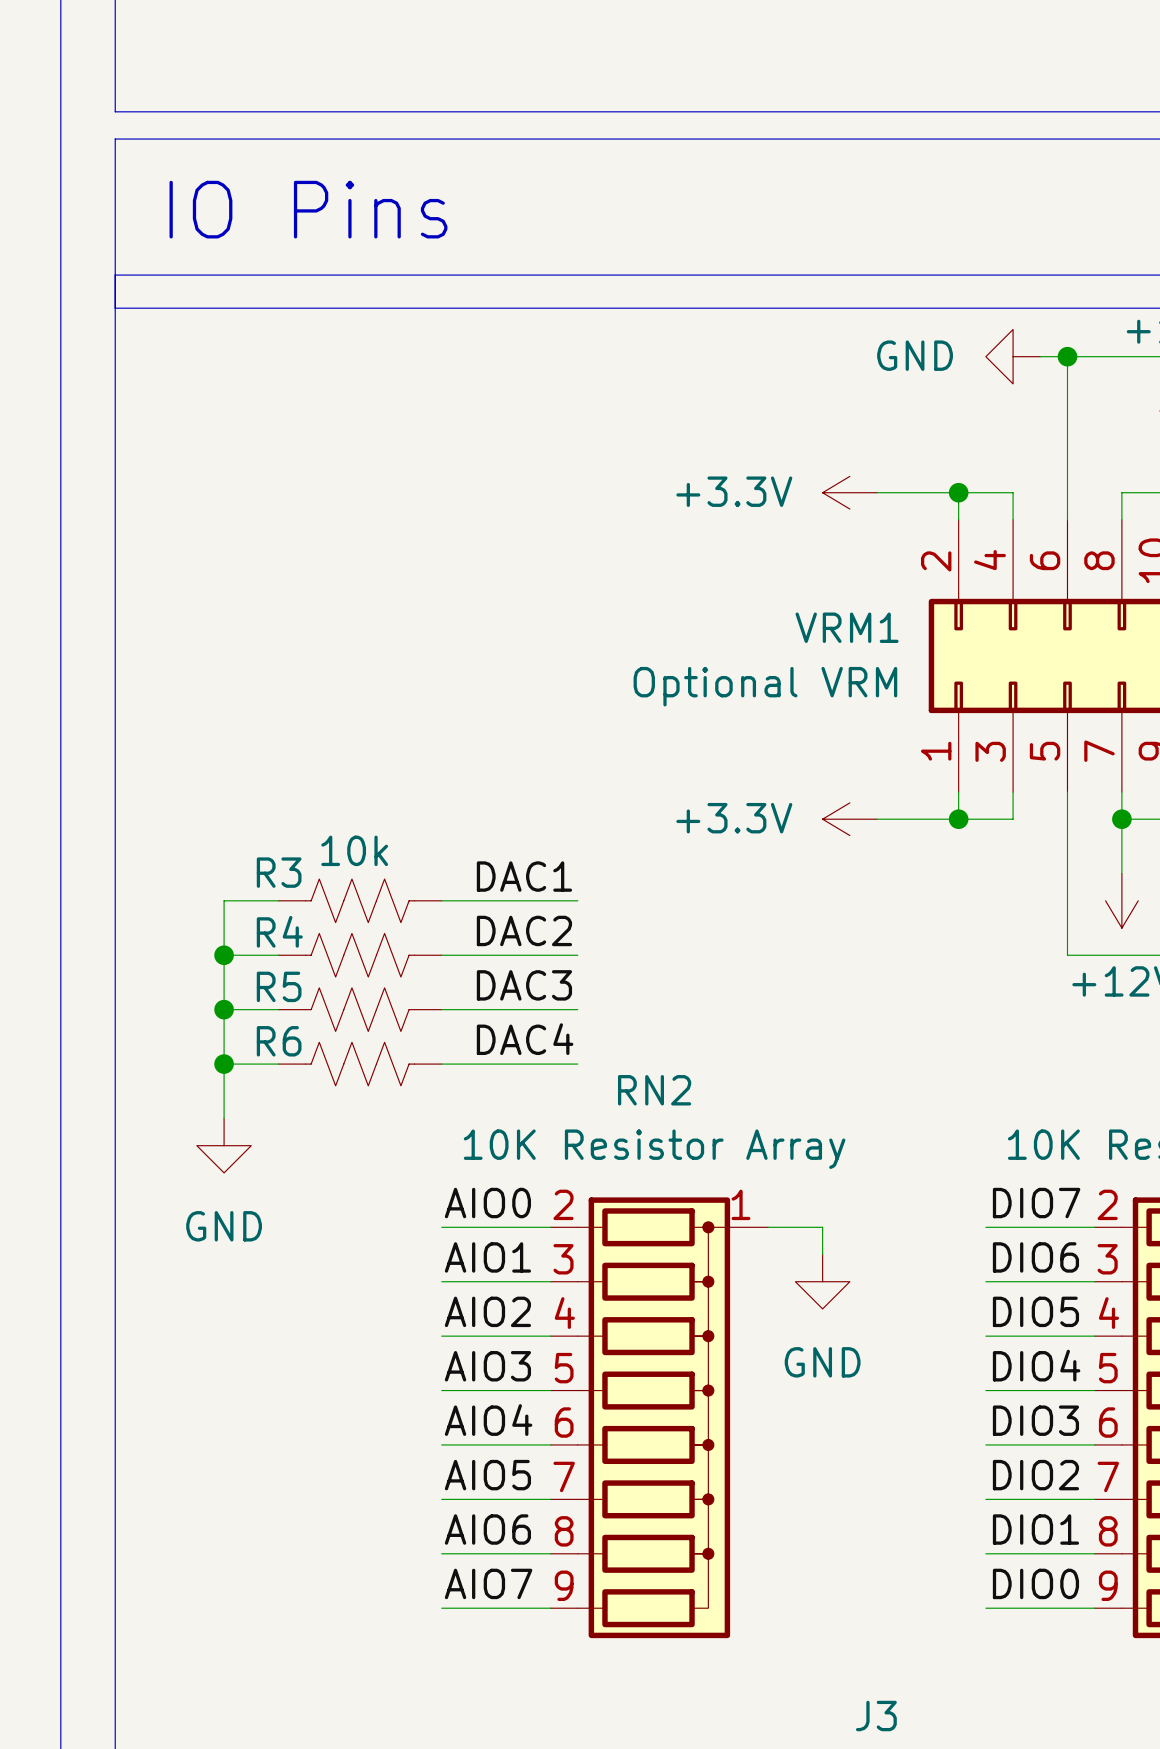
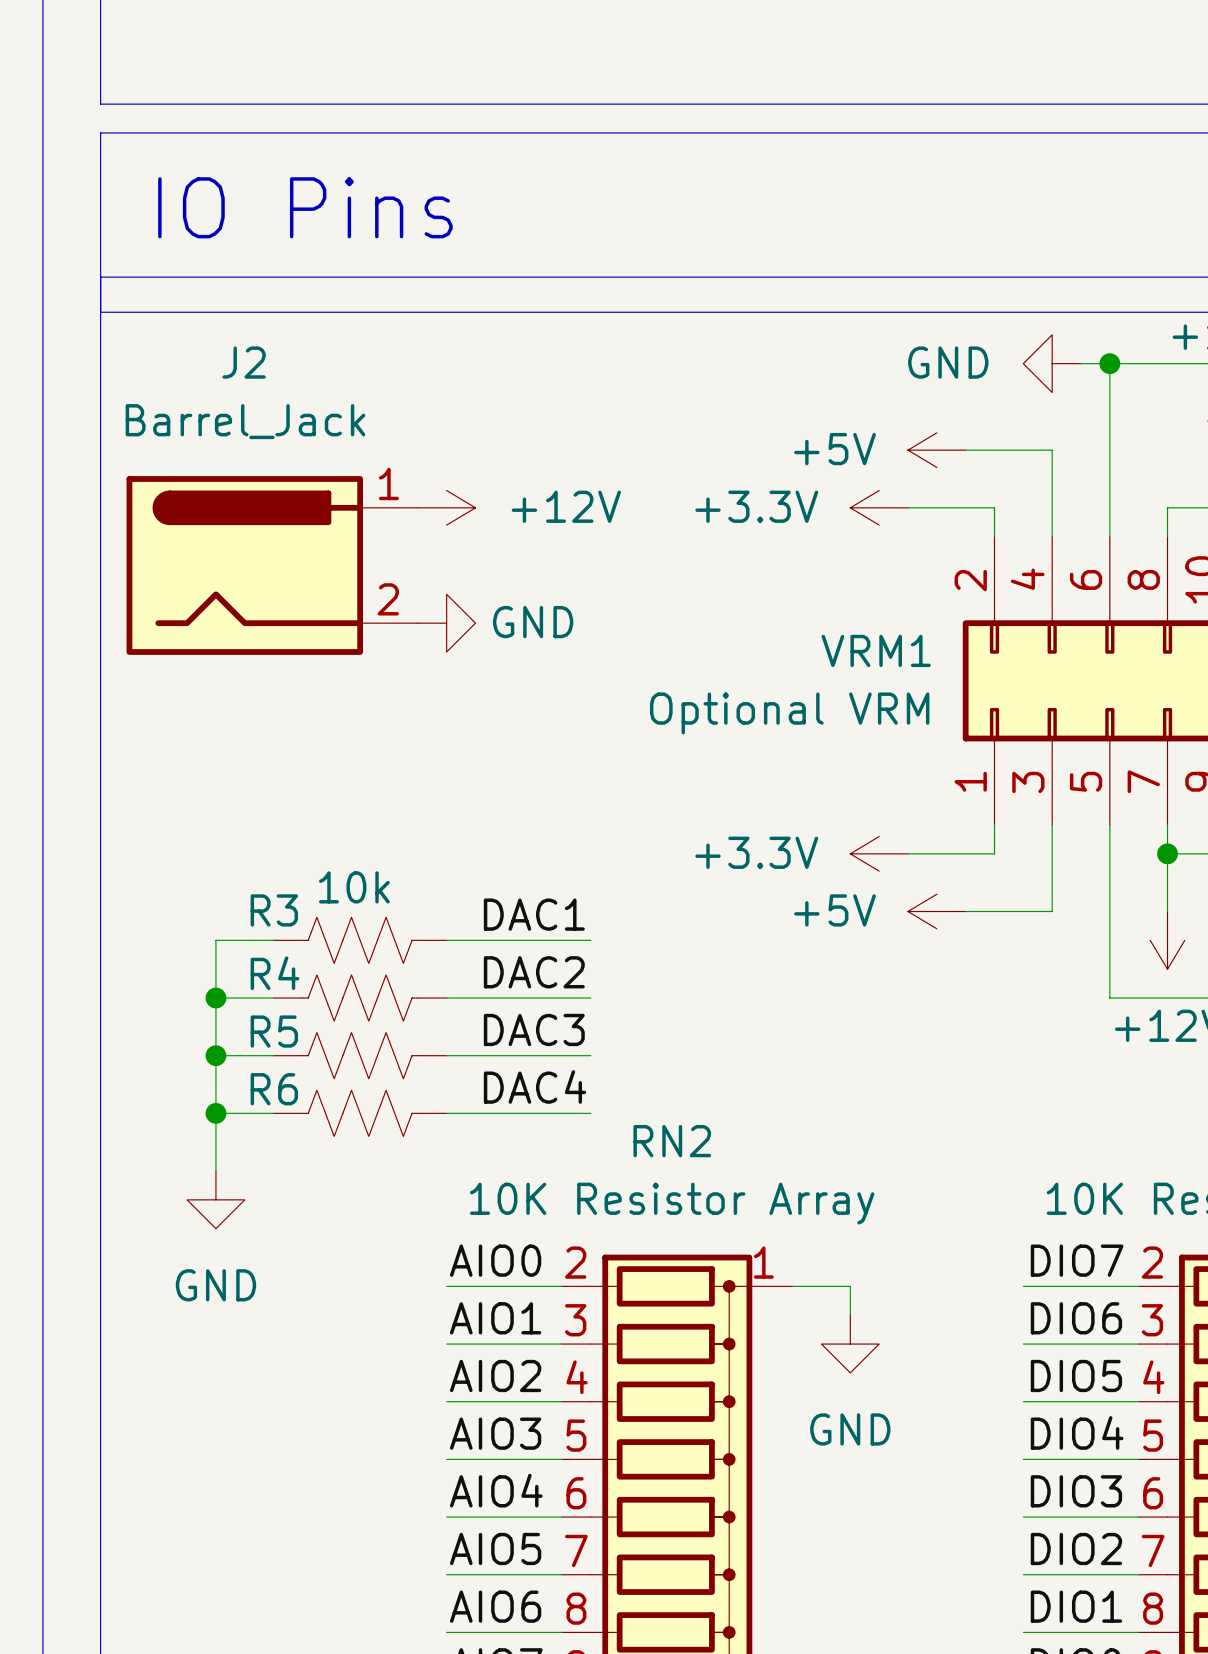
power symbol: none -> +5V (936, 450)
power symbol: none -> +12V (446, 507)
wire: (958, 492) (1013, 492) -> (965, 450) (1052, 450) (1052, 507)
junction: (958, 492) -> none
J2: none -> Barrel_Jack (272, 565)
power symbol: none -> GND (446, 623)
wire: (958, 819) (1013, 819) -> (965, 911) (1052, 911) (1052, 853)
junction: (958, 819) -> none
power symbol: none -> +5V (936, 911)

